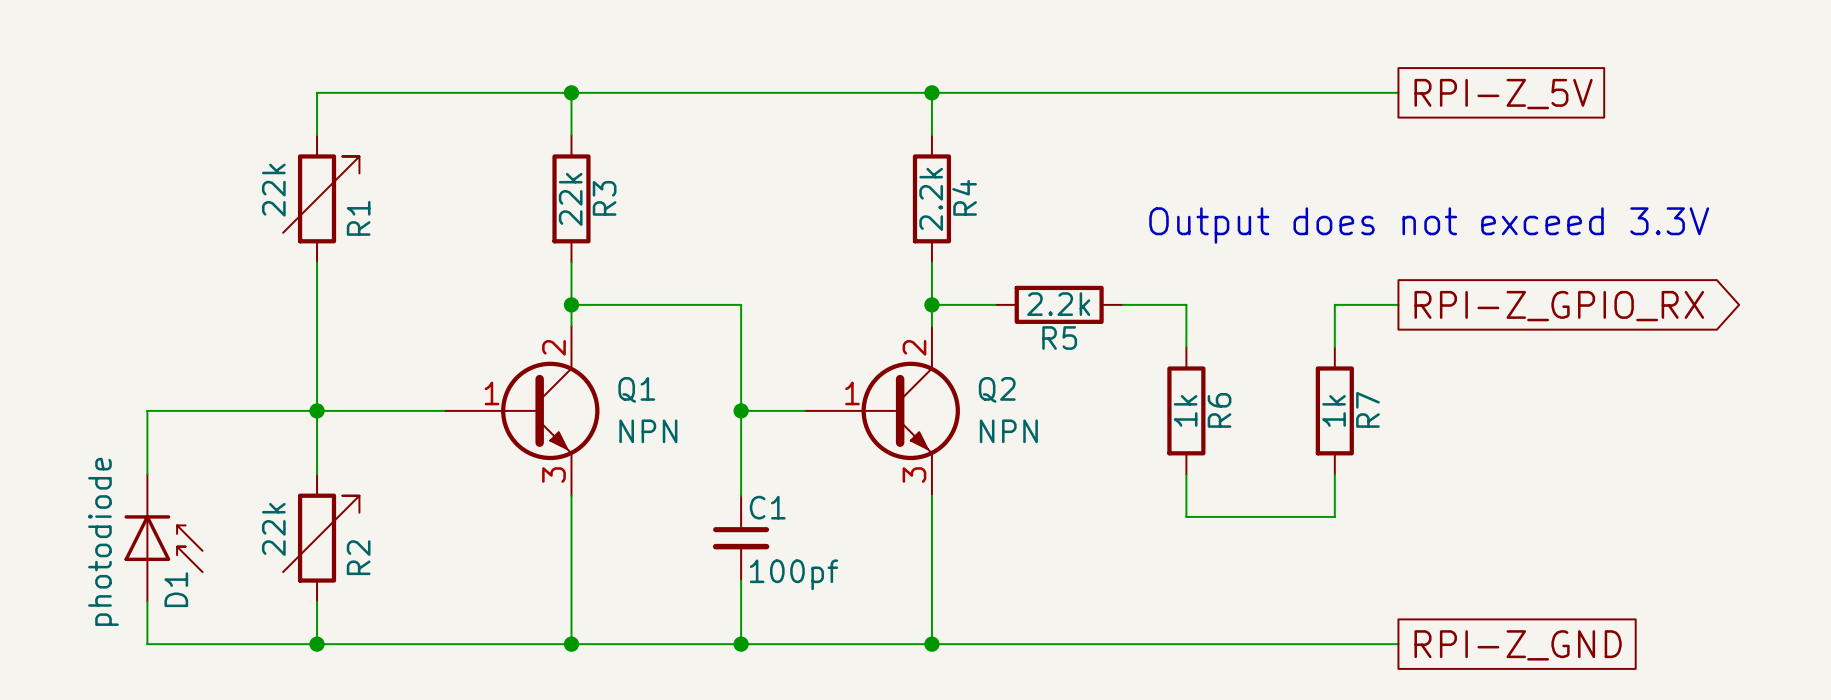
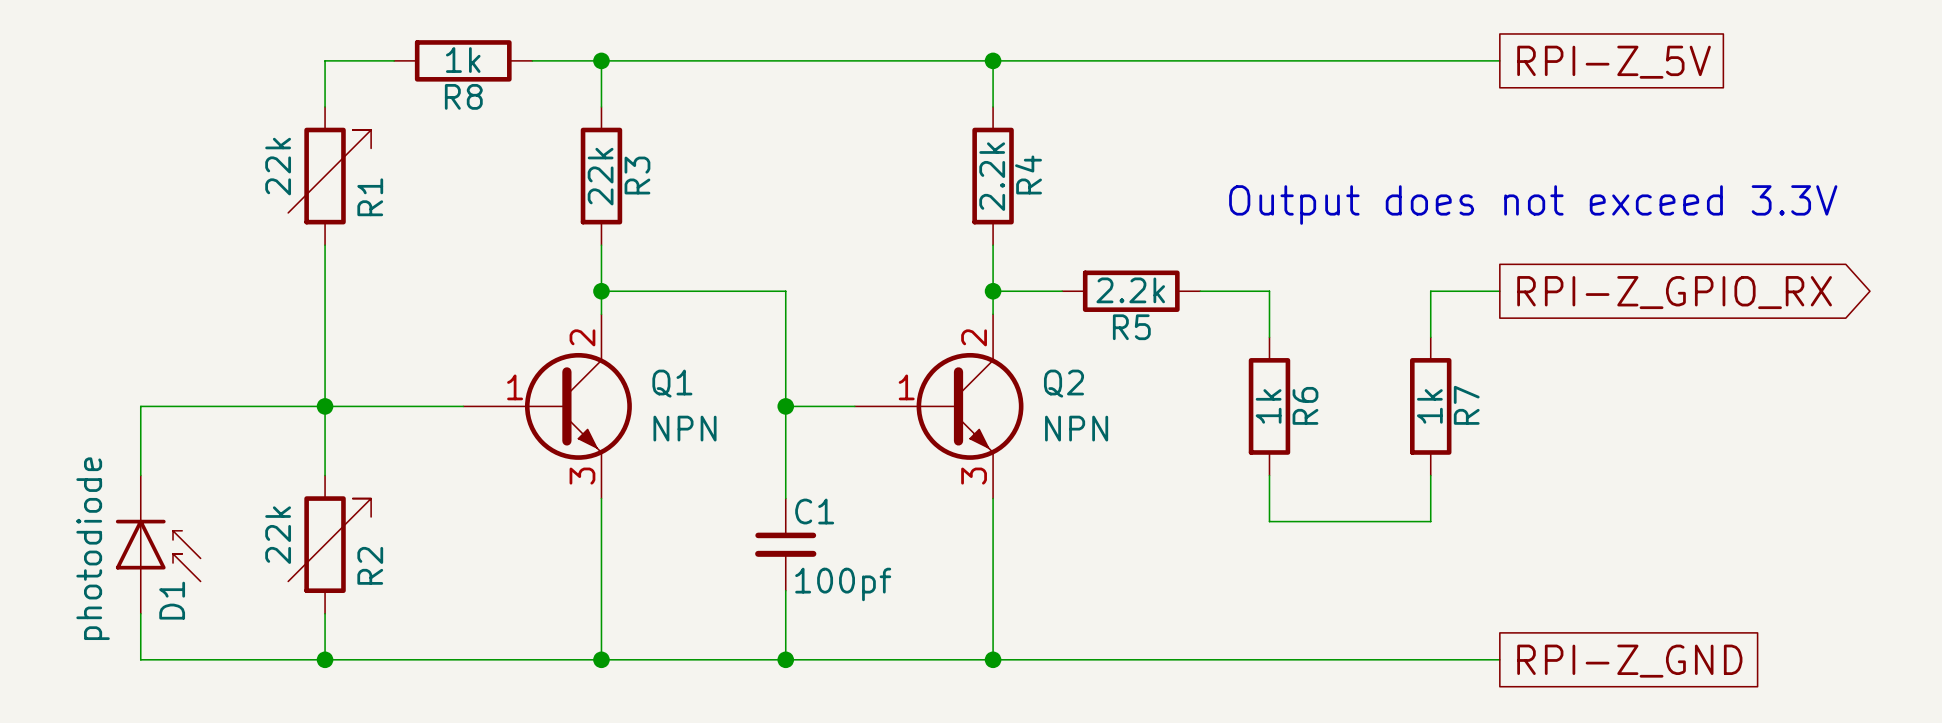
wire: (380, 92) (507, 92) -> none
R8: none -> 1k (463, 60)

